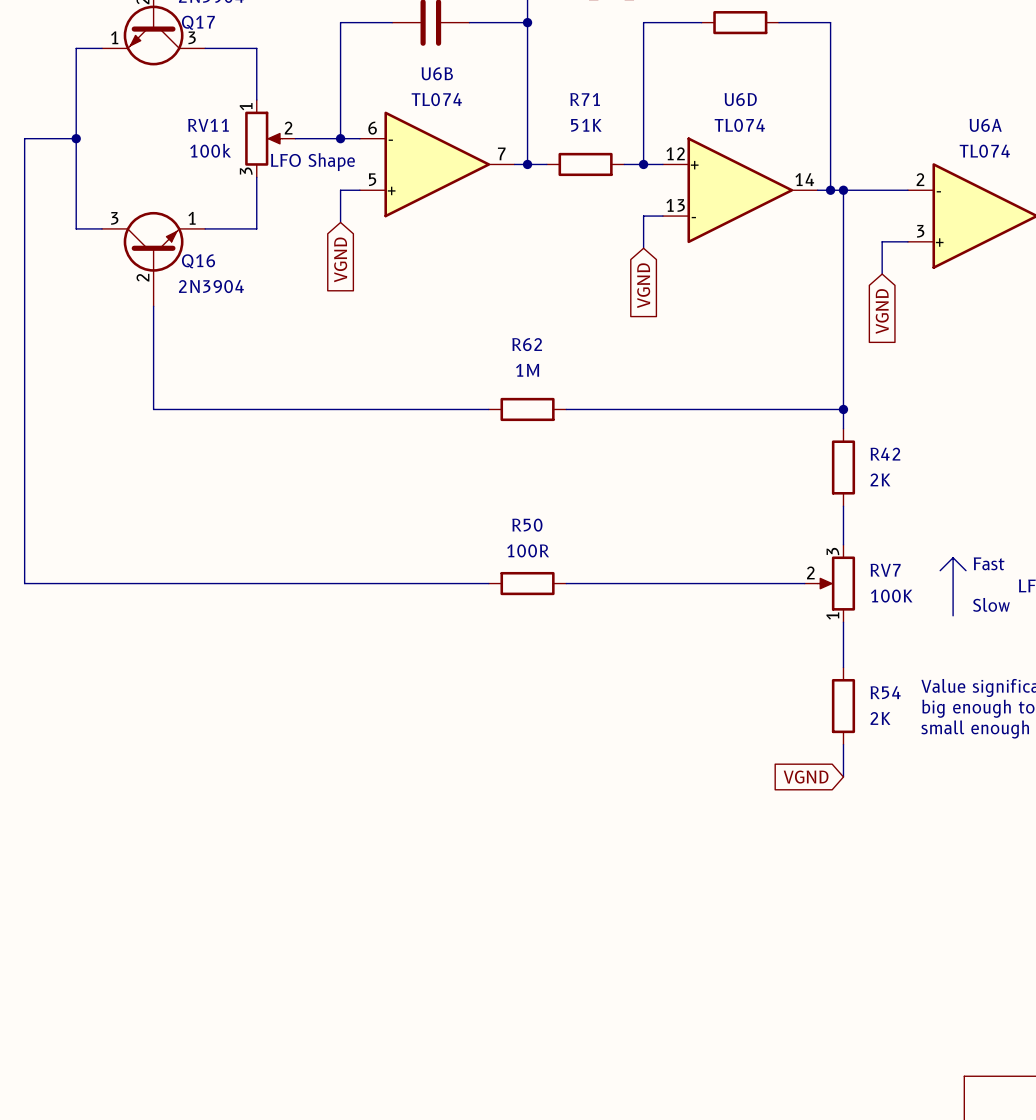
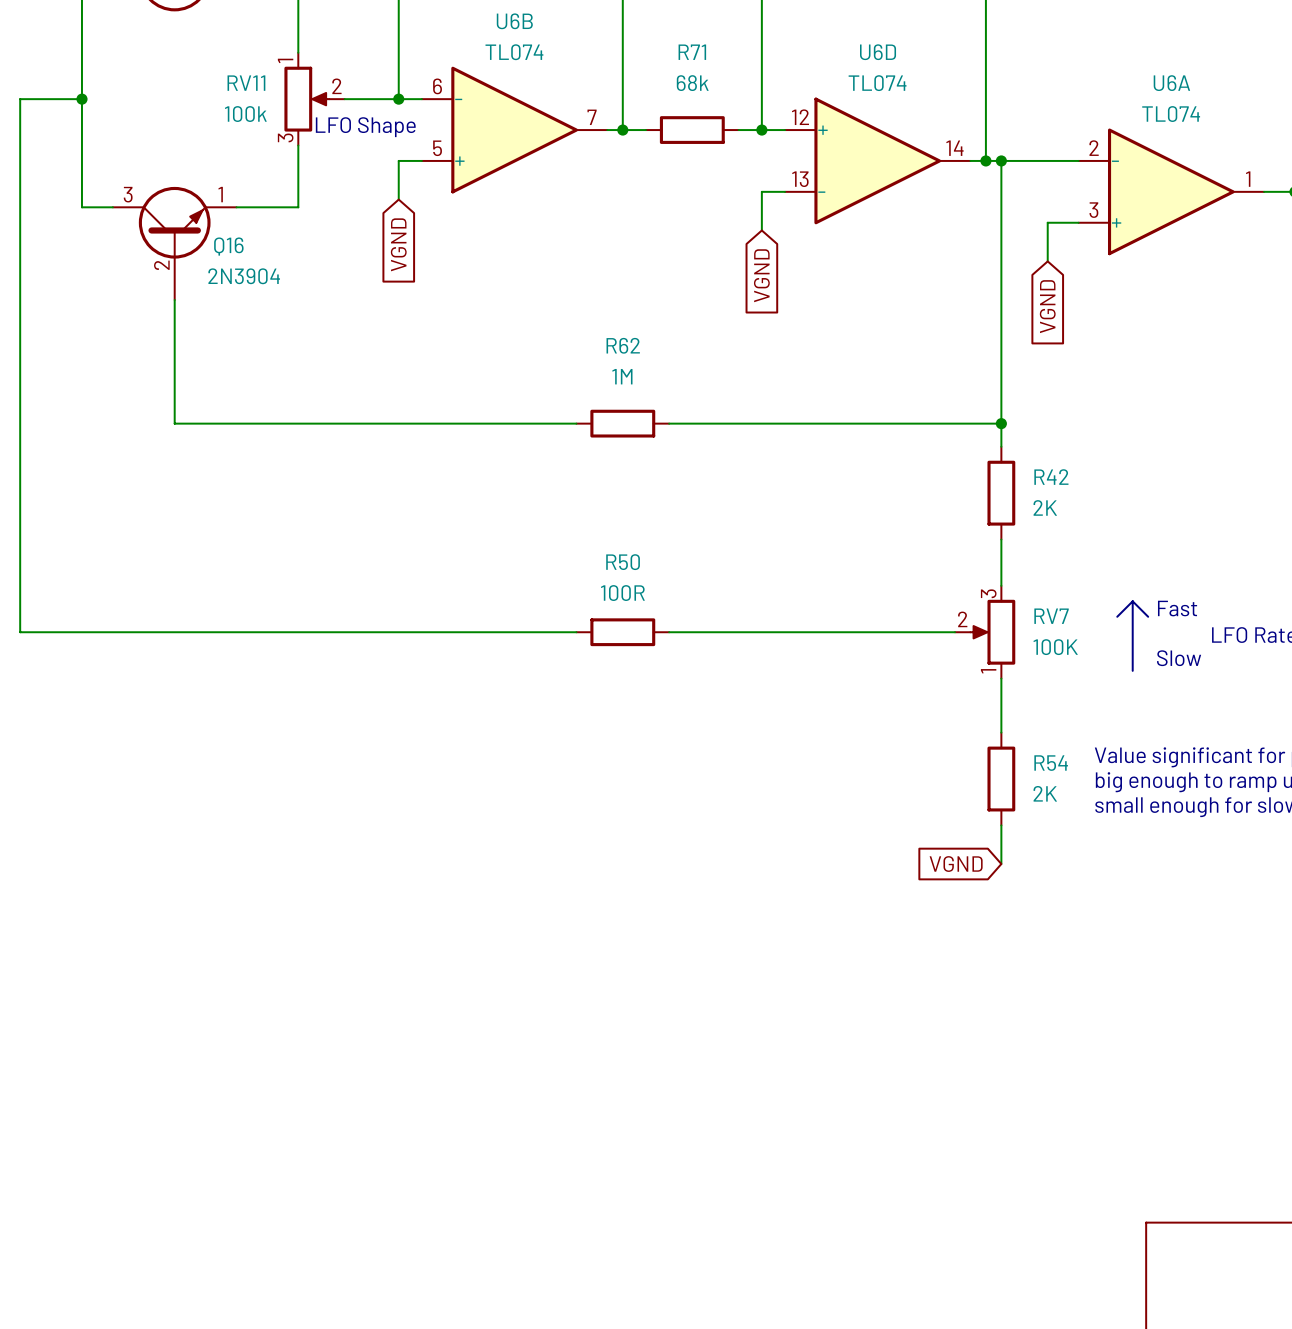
R71 value: 51K (586, 125) -> 68k (692, 83)

